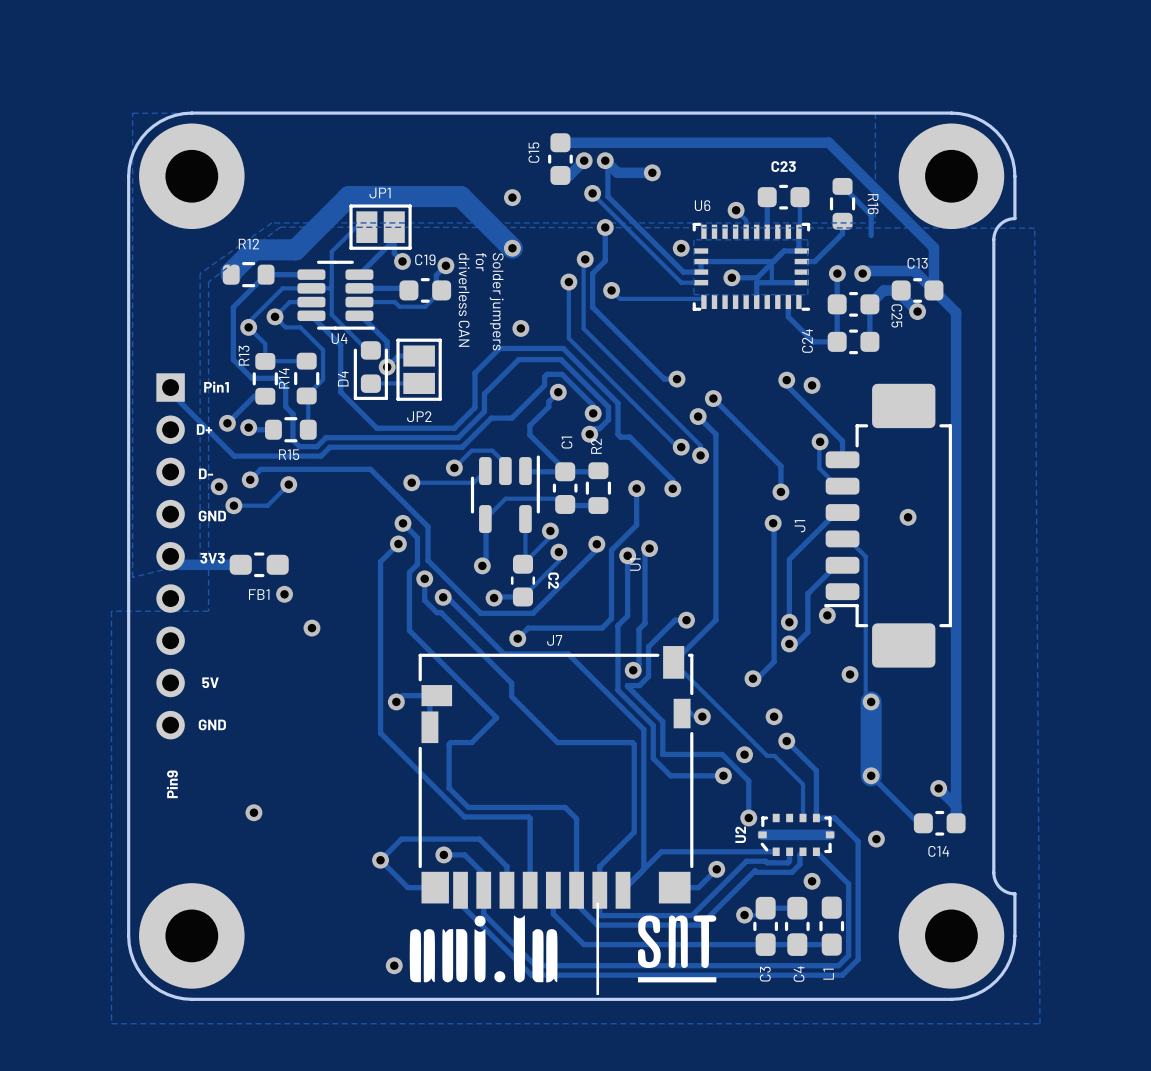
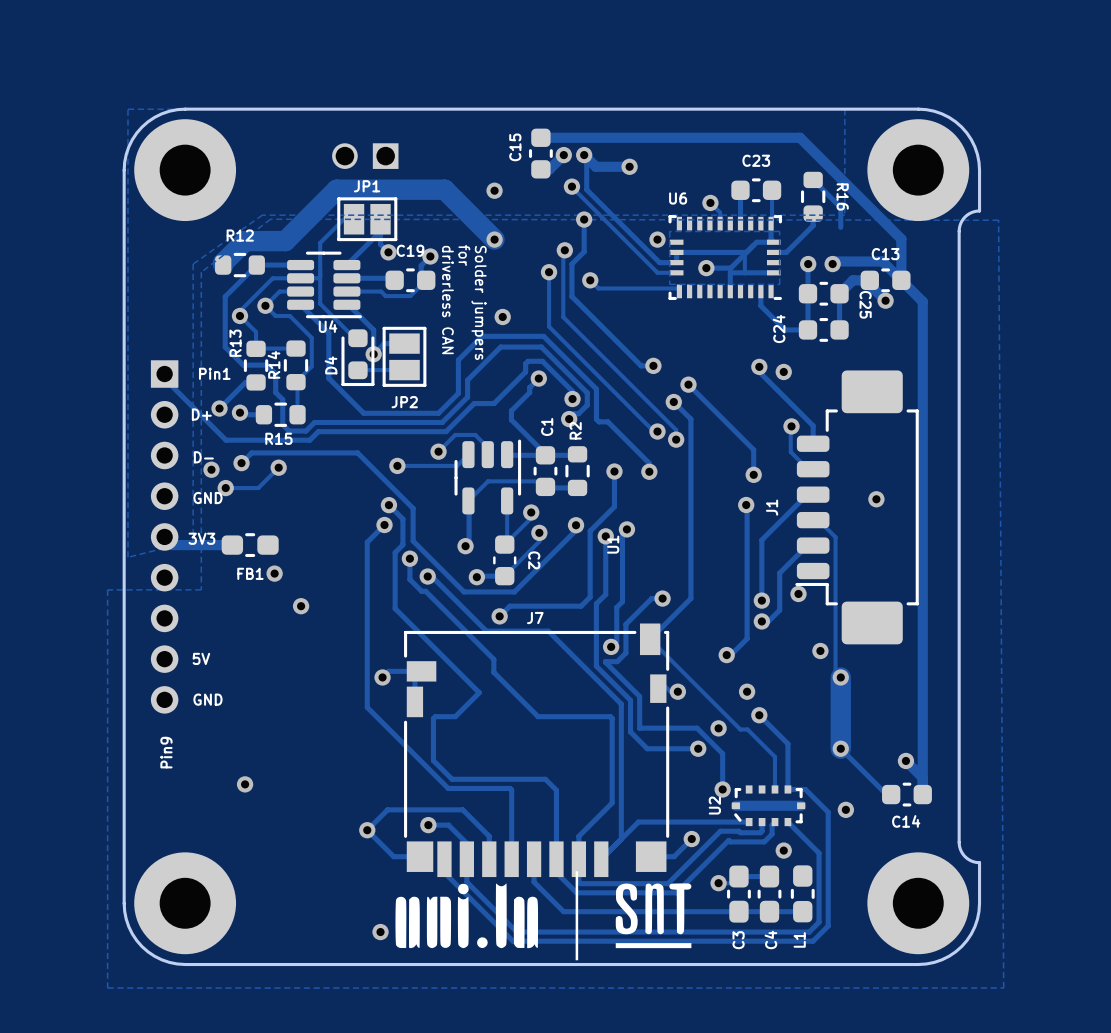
part: none -> (365, 156)

